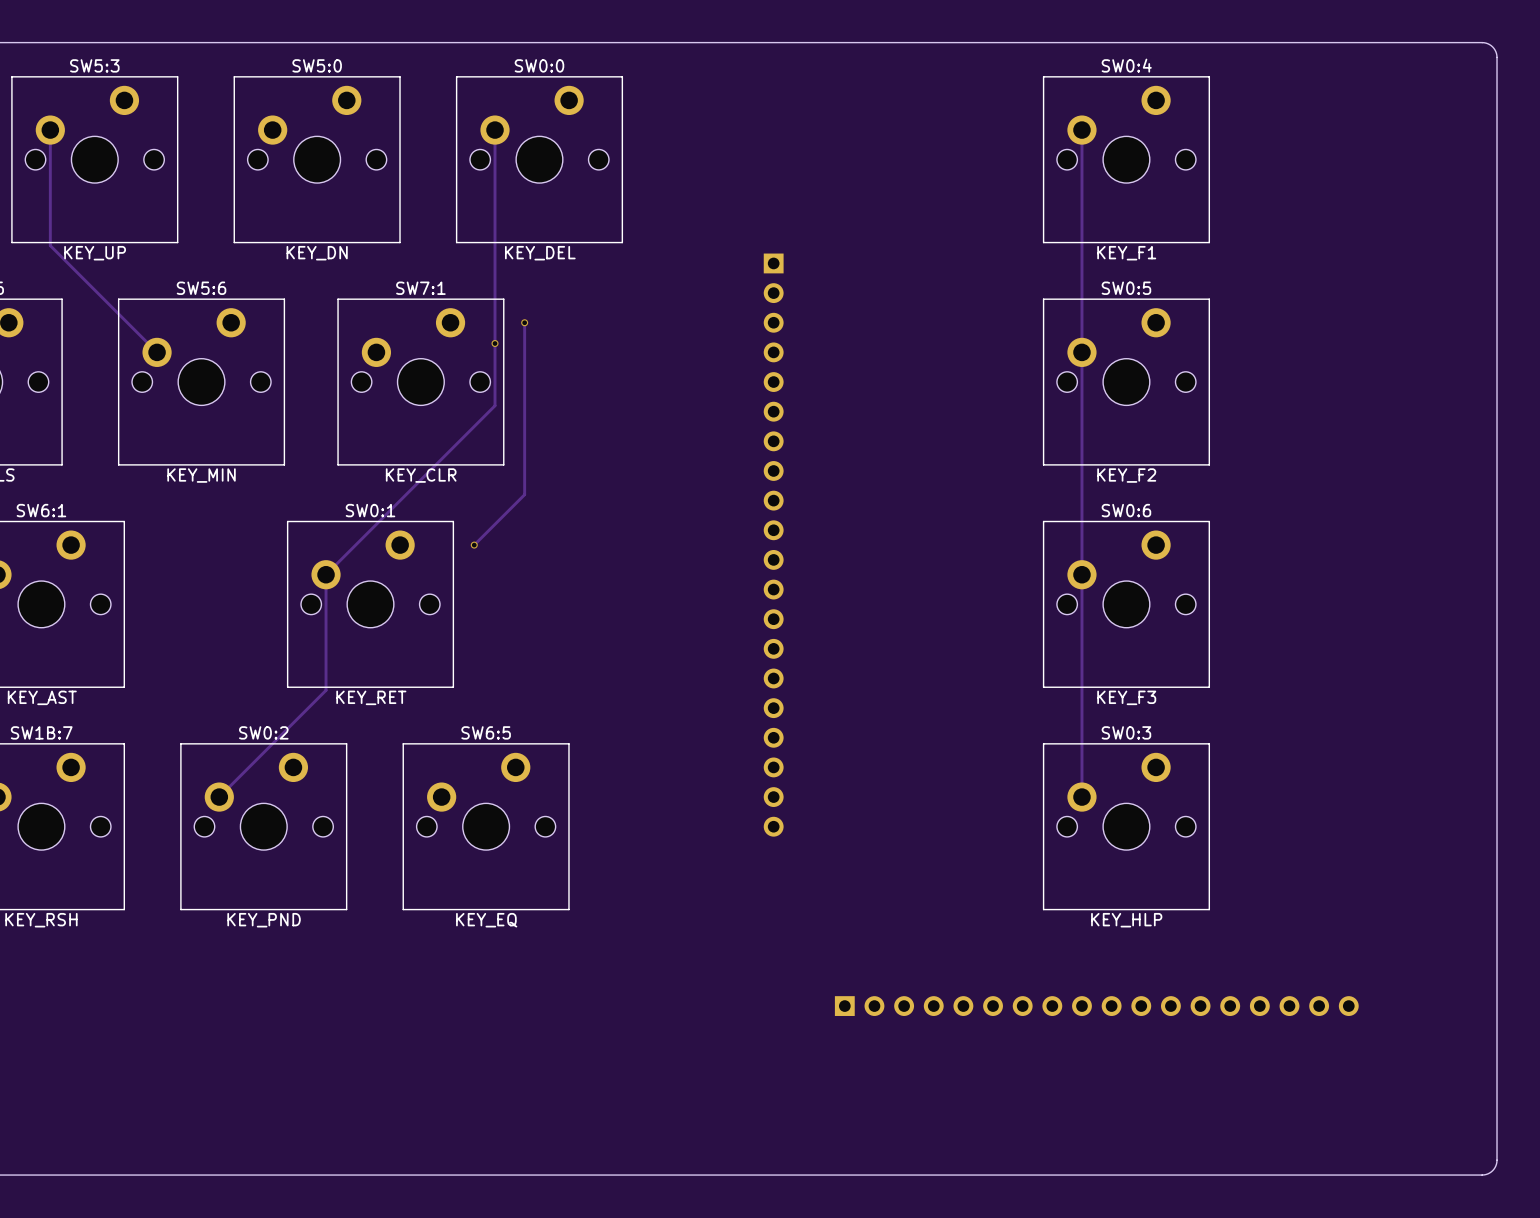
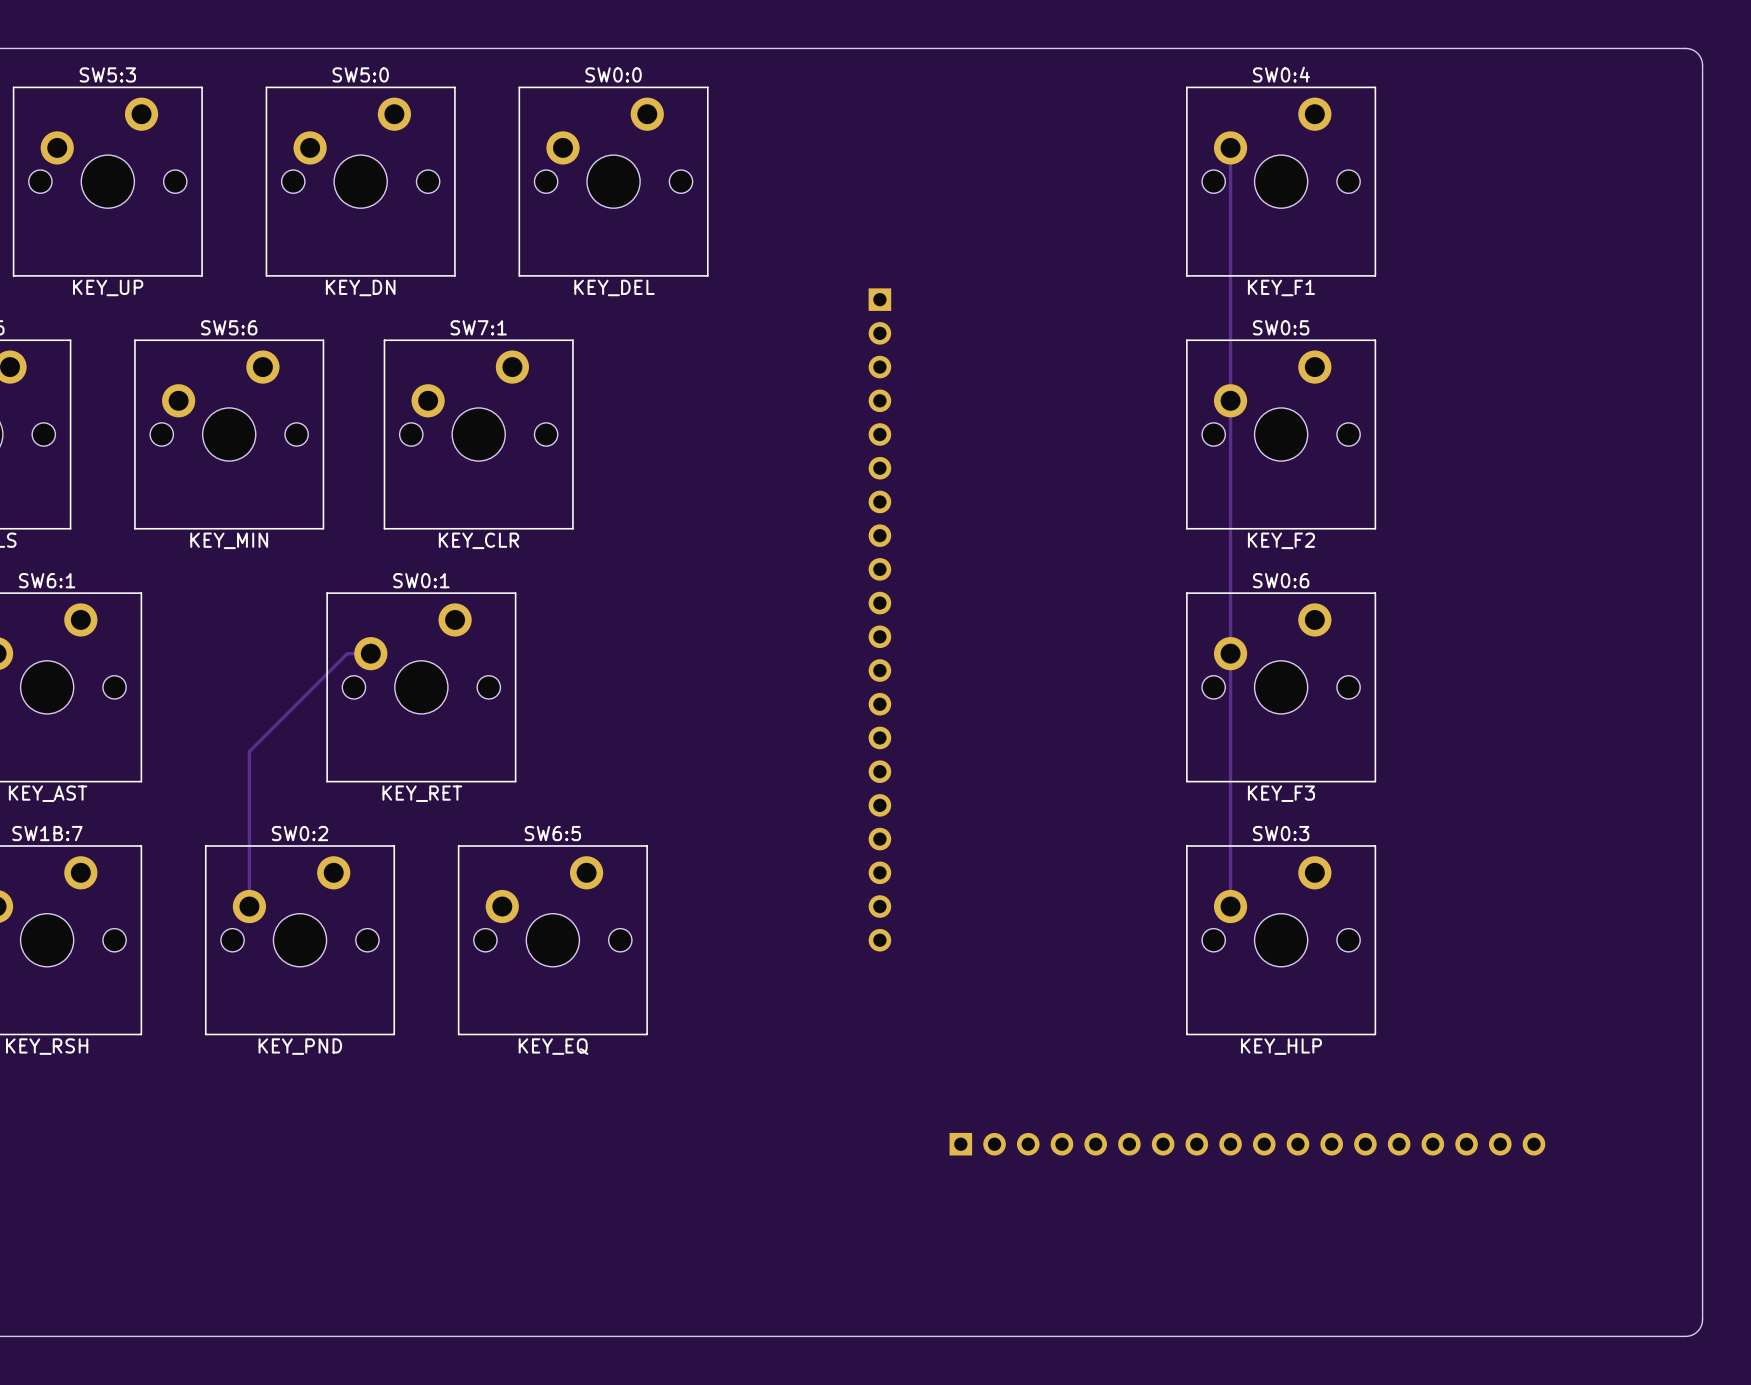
track: (50, 130) (50, 245) (157, 352) -> none
track: (495, 130) (495, 405) (326, 574) (326, 690) (219, 797) -> (370, 653) (347, 653) (249, 751) (249, 906)
track: (524, 322) (524, 494) (474, 545) -> none
via: (524, 322) -> none
via: (495, 343) -> none
via: (474, 545) -> none

